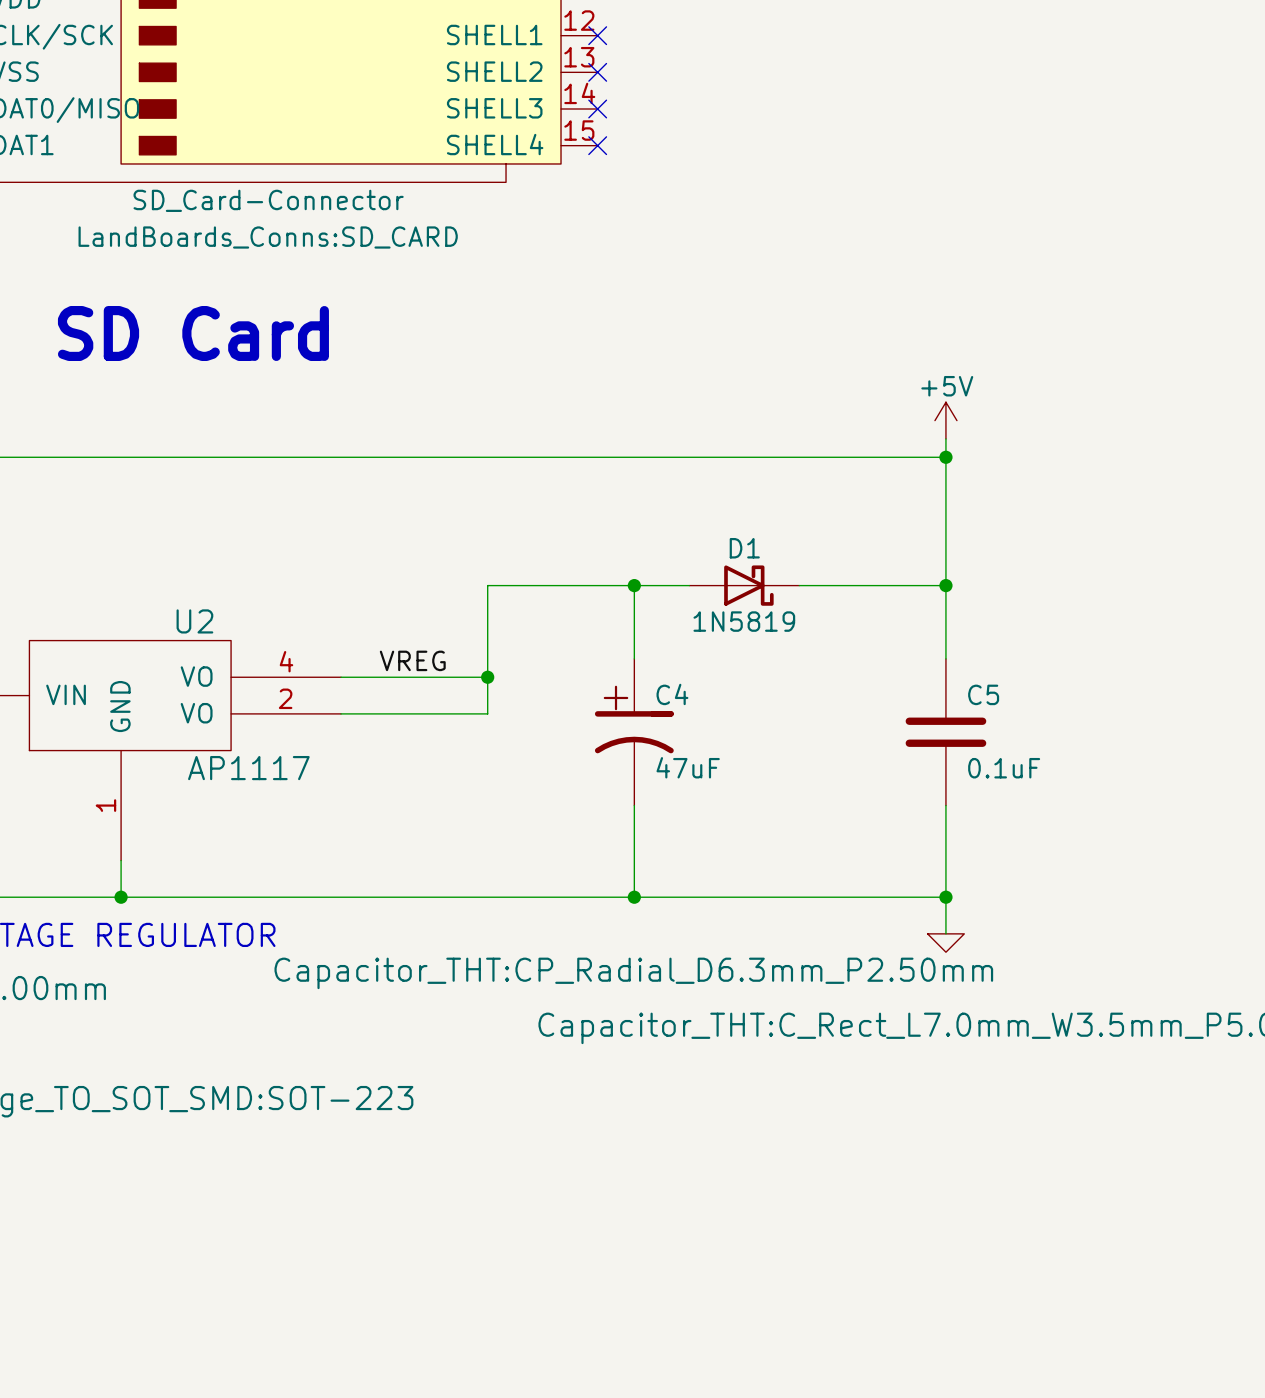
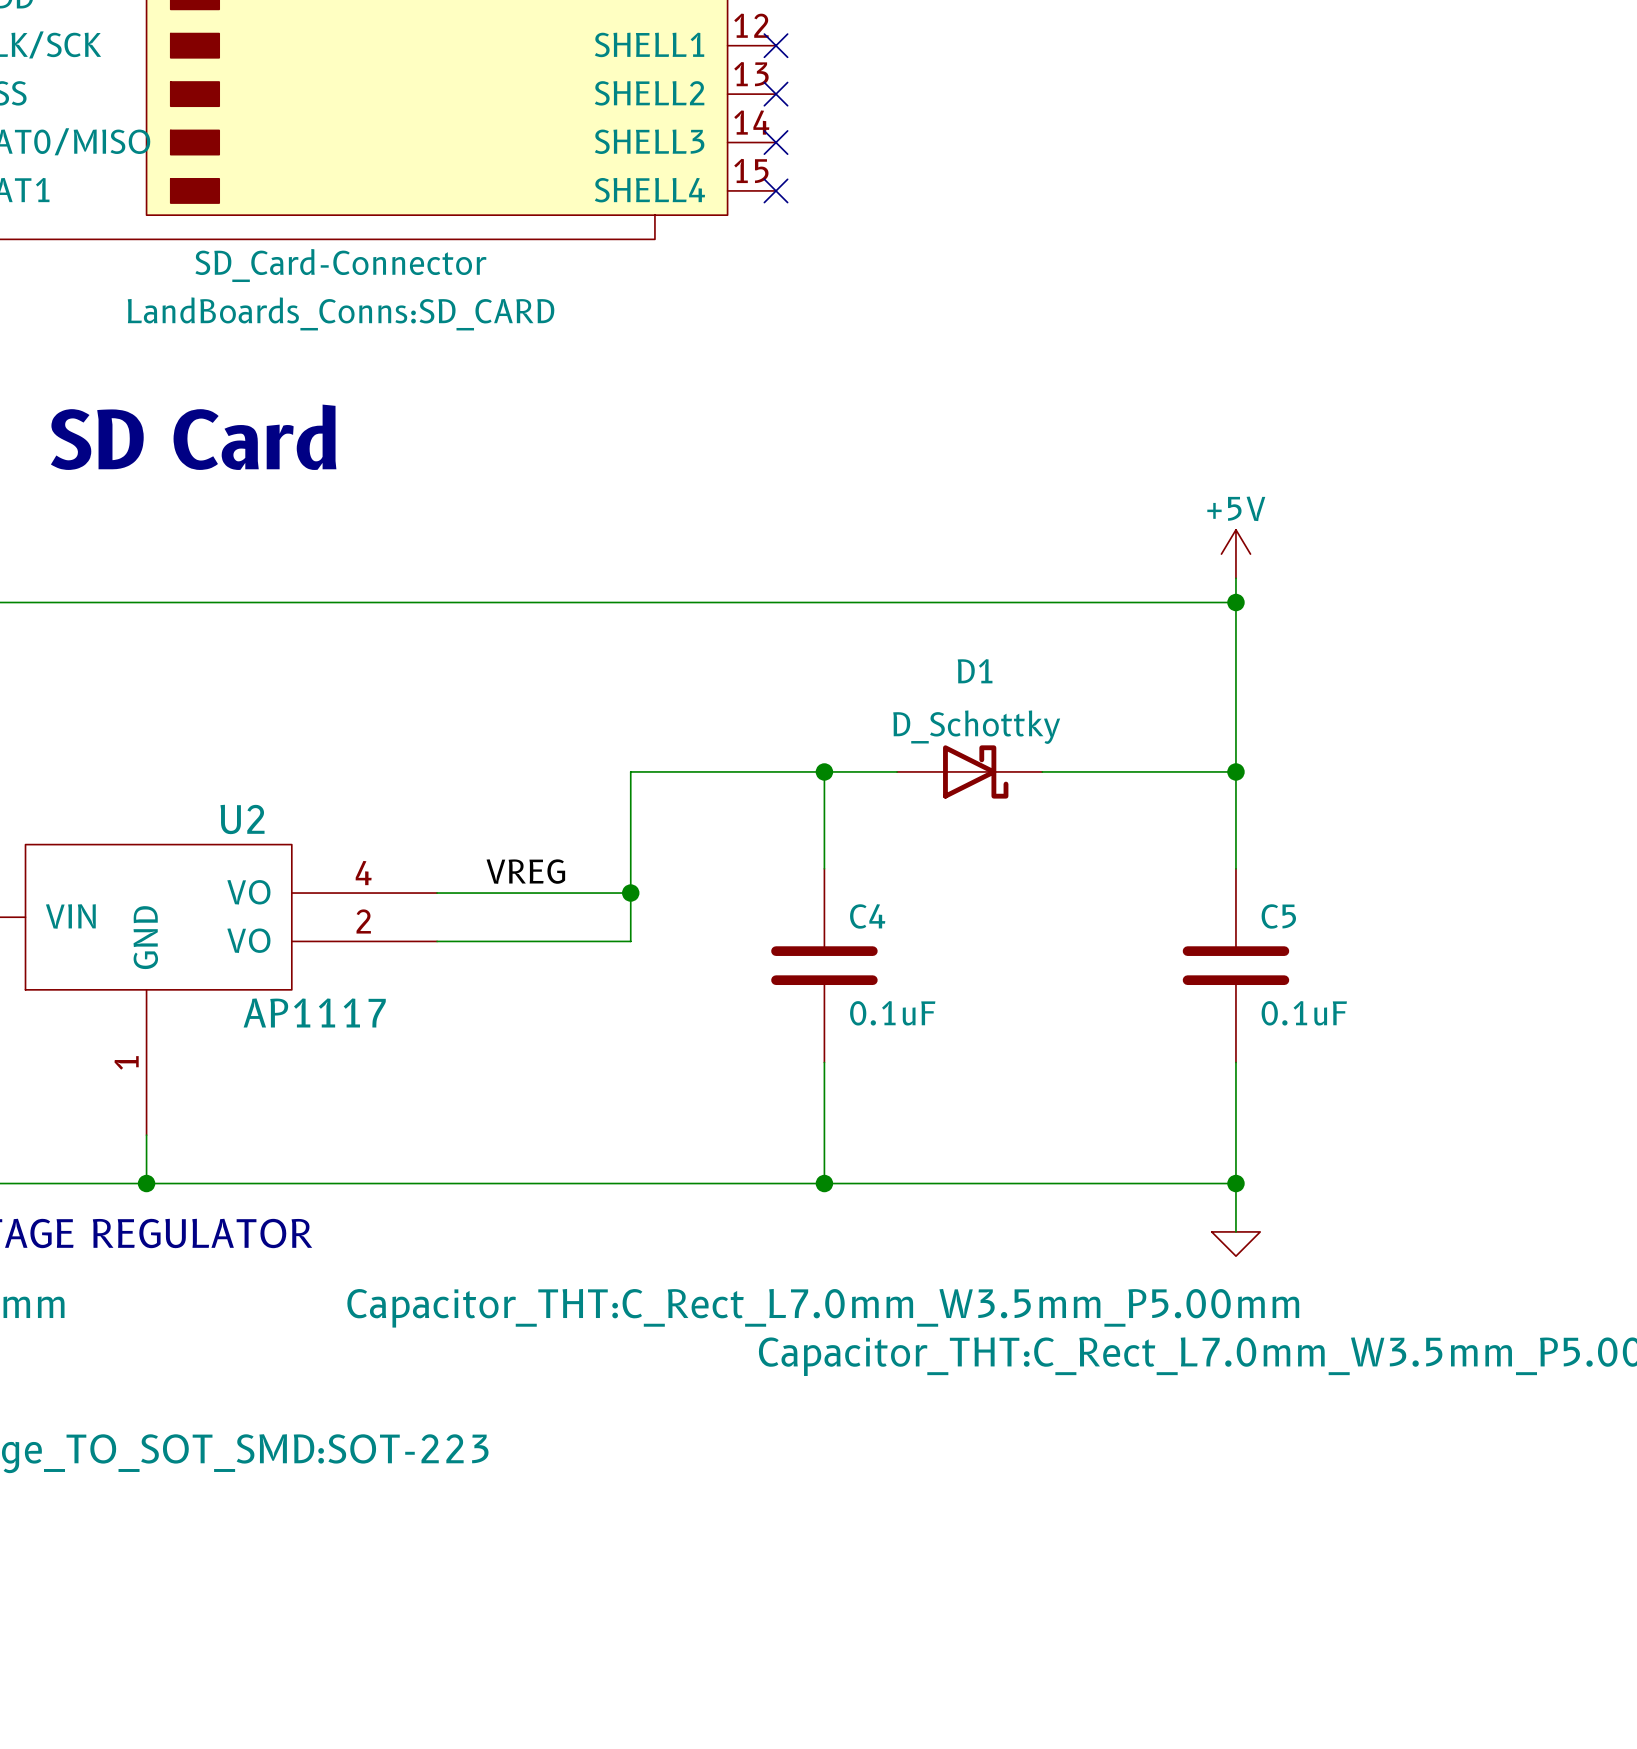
D1 name position: D1 (744, 548) -> D1 (975, 671)
D1 value: 1N5819 (744, 621) -> D_Schottky (976, 727)
C4 symbol: [594, 658, 674, 806] -> [771, 868, 878, 1063]
C4 value: 47uF (688, 767) -> 0.1uF (892, 1013)
C4 text: Capacitor_THT:CP_Radial_D6.3mm_P2.50mm (633, 973) -> Capacitor_THT:C_Rect_L7.0mm_W3.5mm_P5.00mm (823, 1308)

